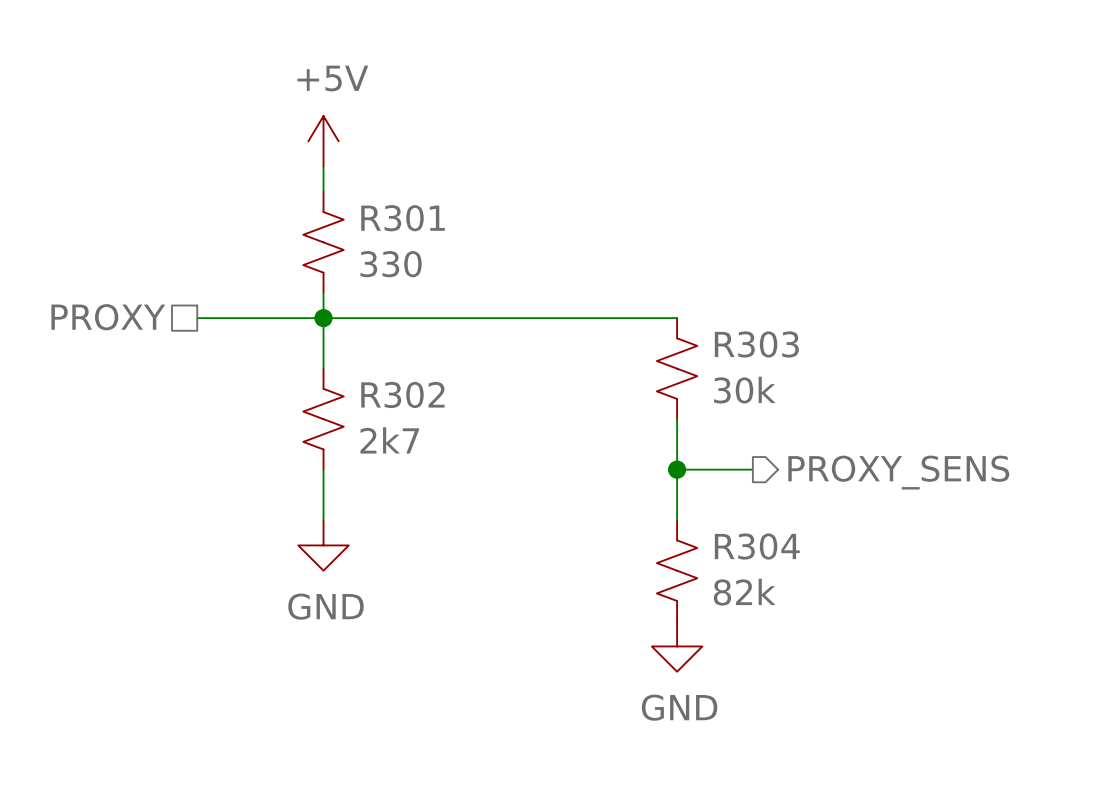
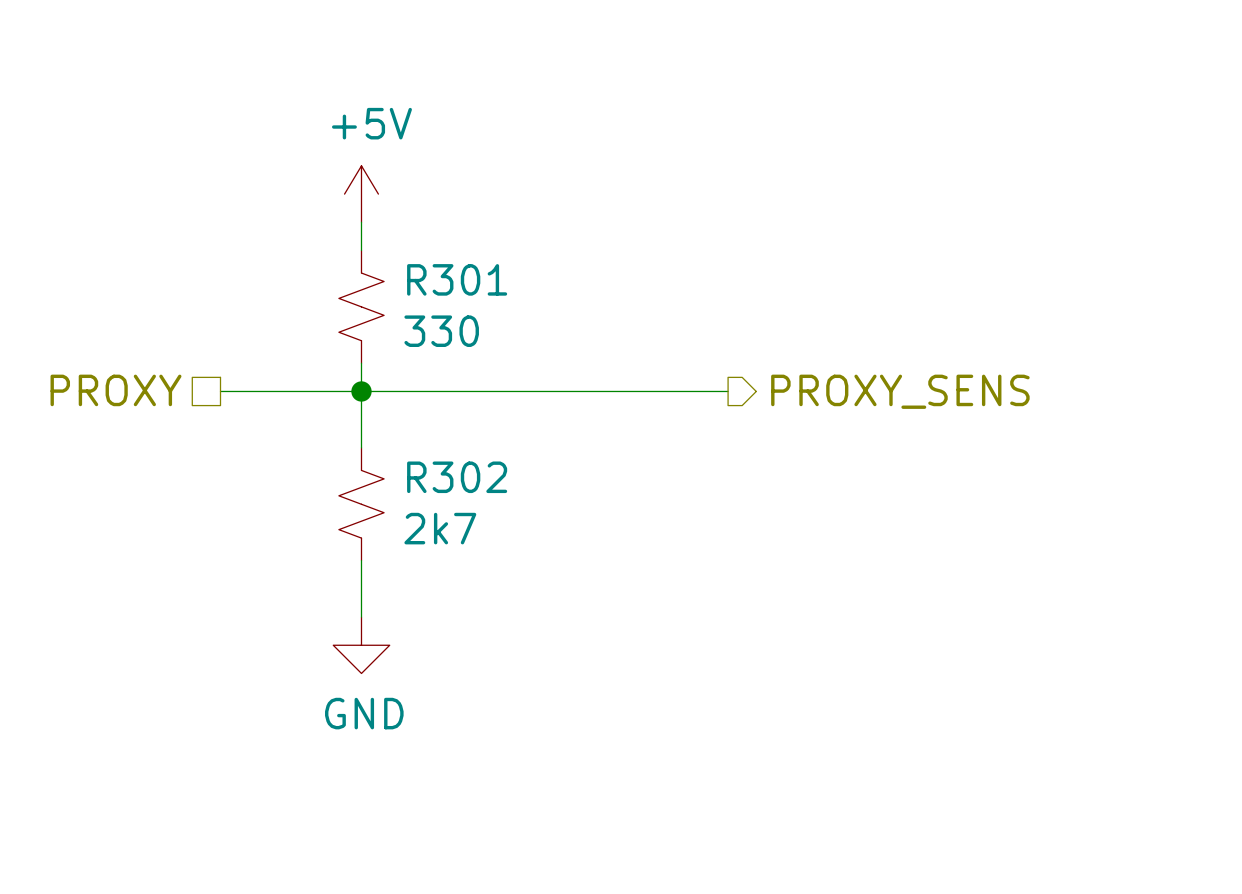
wire: (651, 318) (677, 318) -> none
R303: 30k (677, 368) -> none
wire: (677, 419) (677, 520) -> none
wire: (677, 469) (752, 469) -> none
junction: (677, 469) -> none
hierarchical label position: PROXY_SENS (898, 472) -> PROXY_SENS (900, 391)
R304: 82k (677, 570) -> none
power symbol: GND (677, 646) -> none

